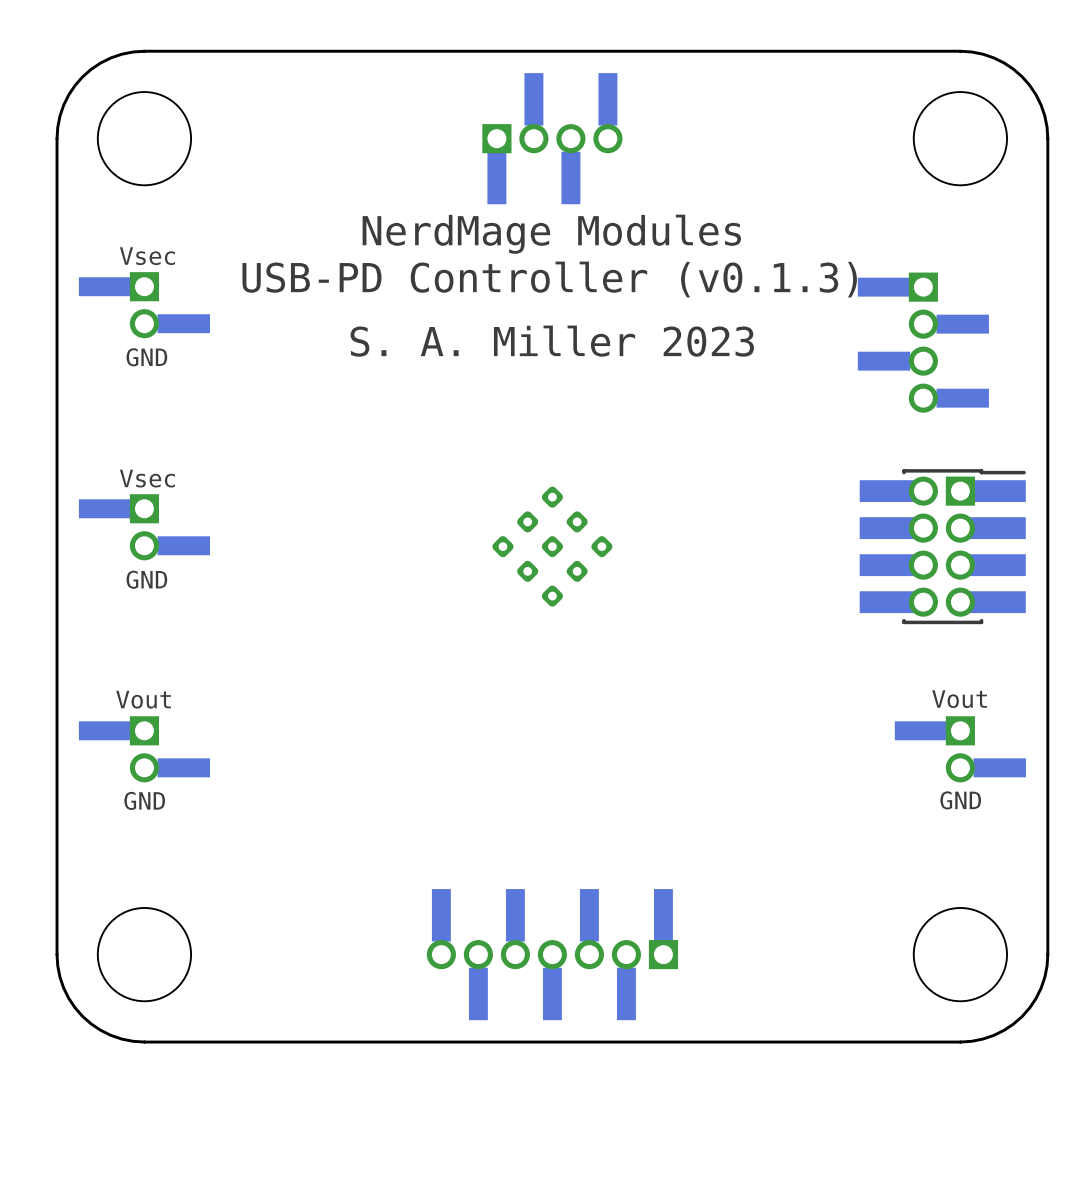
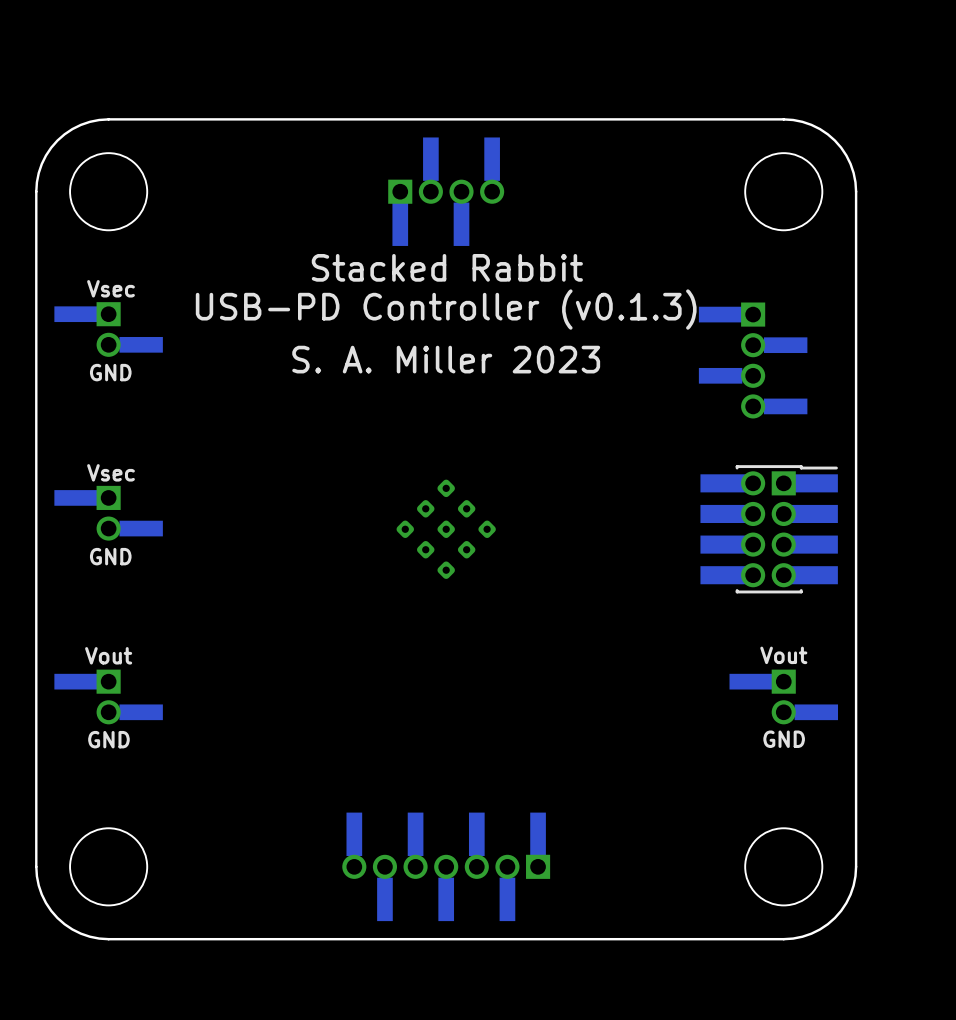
text: NerdMage Modules (551, 234) -> Stacked Rabbit (447, 267)

